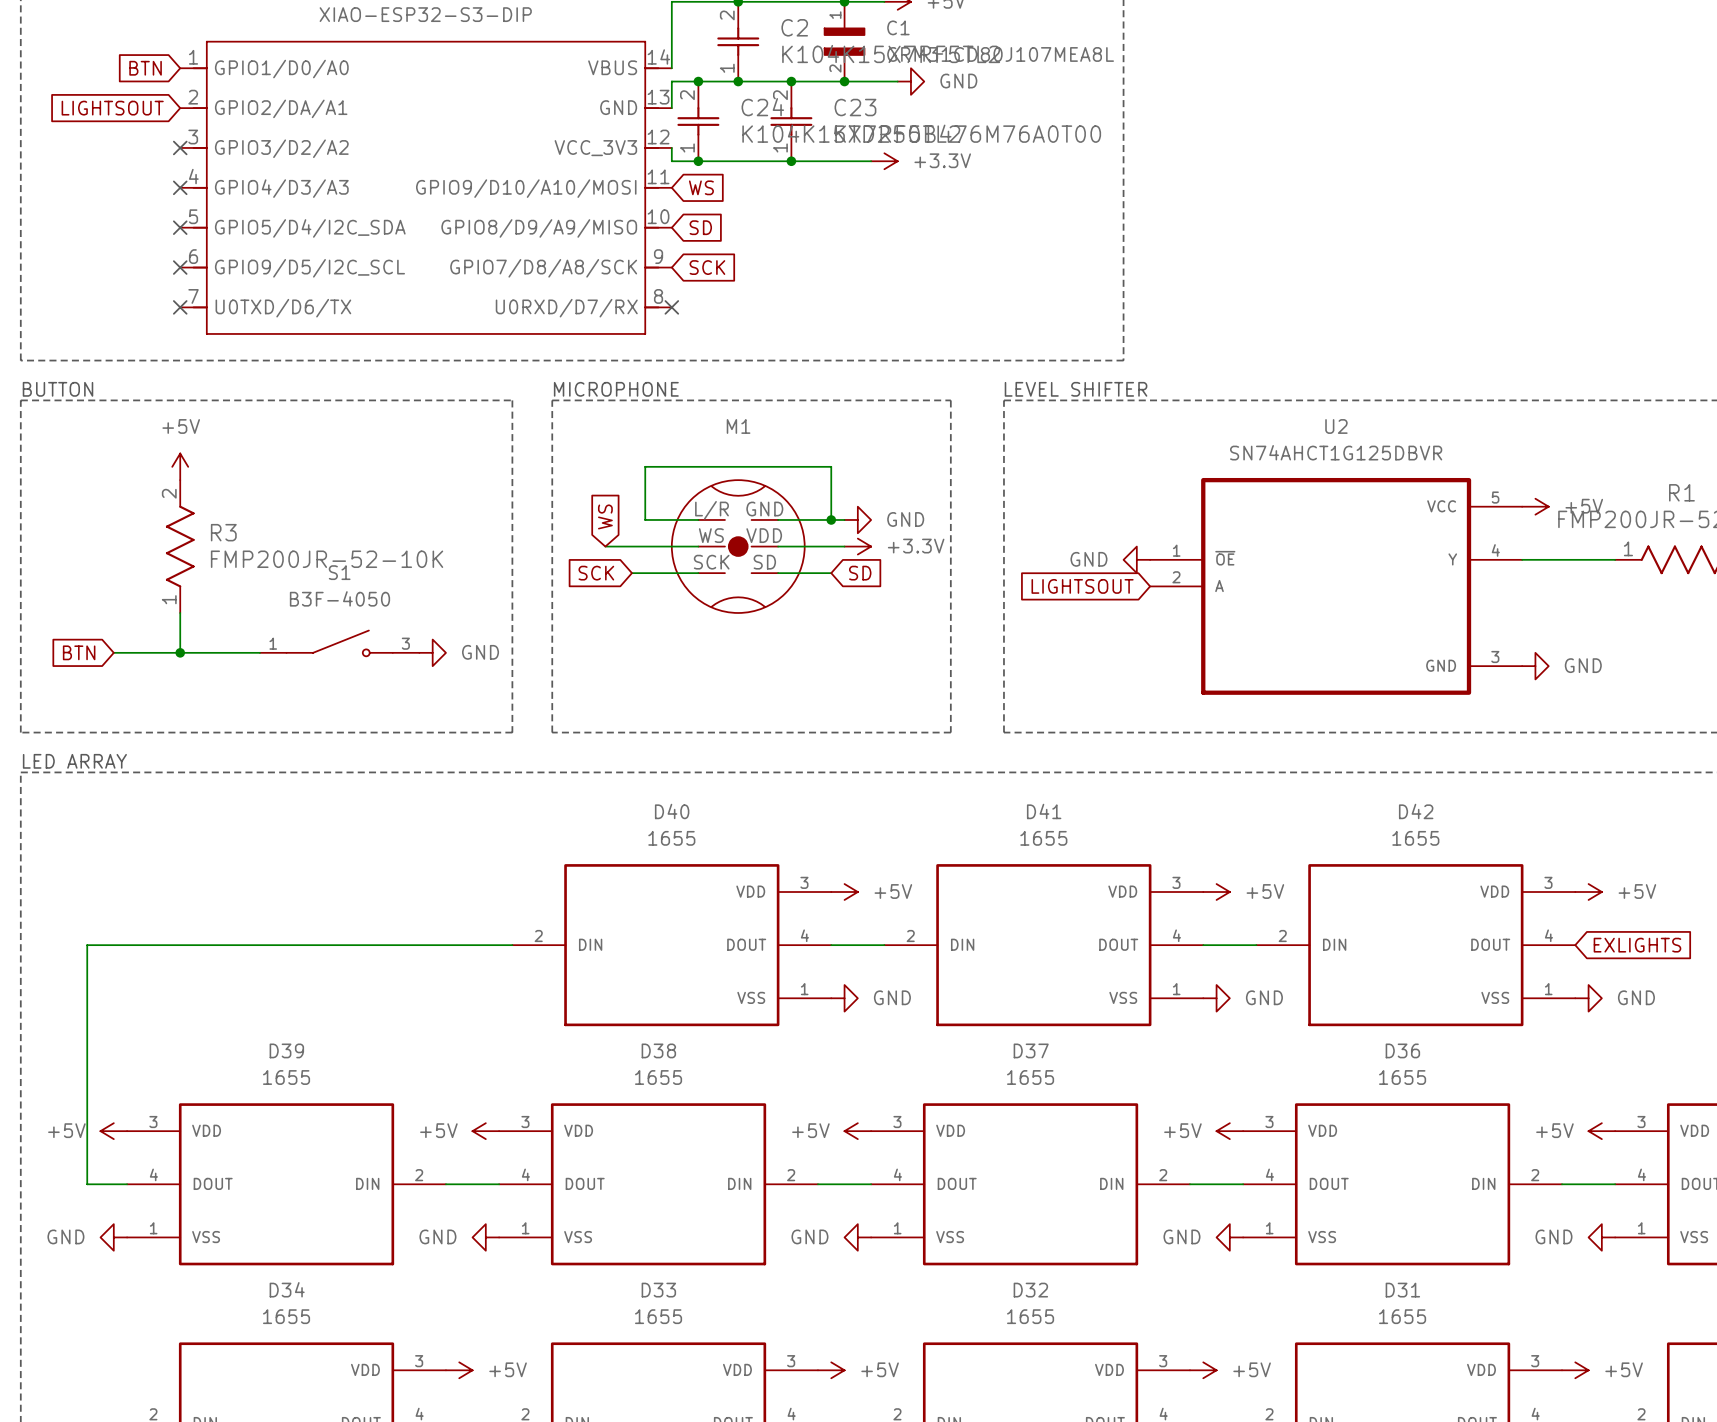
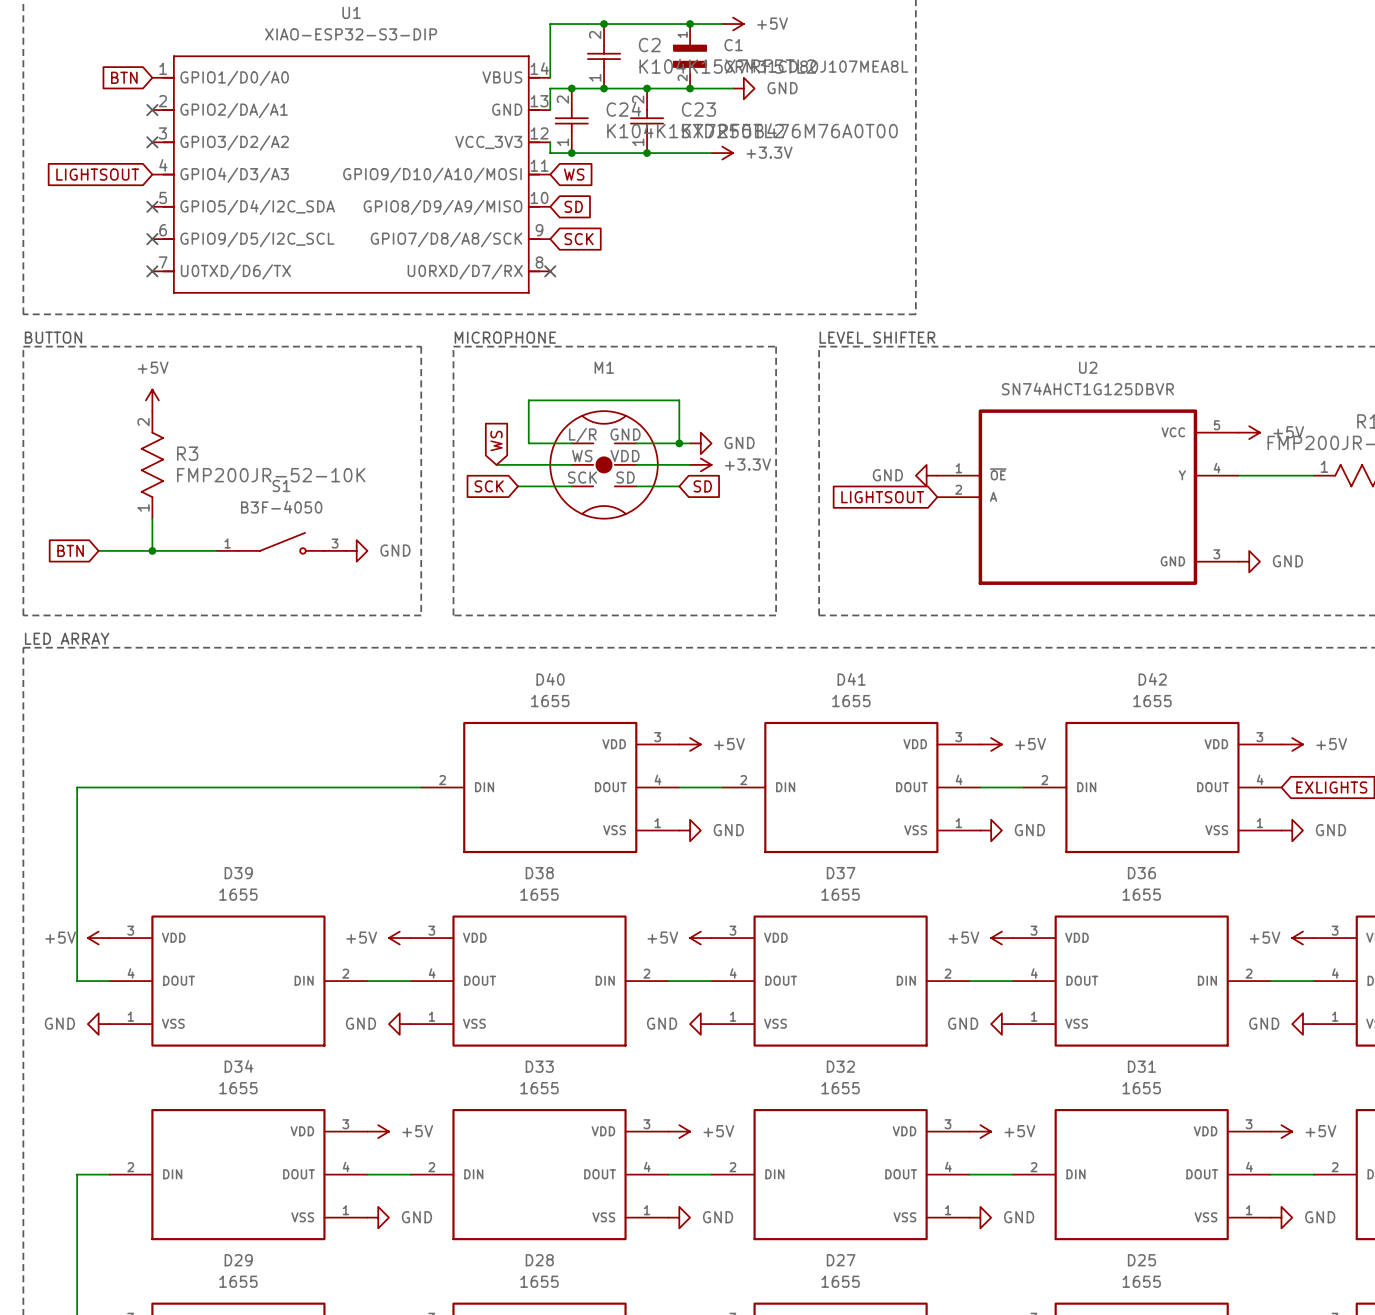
global label position: LIGHTSOUT (112, 108) -> LIGHTSOUT (97, 174)
no-connect mark: none -> (152, 110)
no-connect mark: (180, 187) -> none

